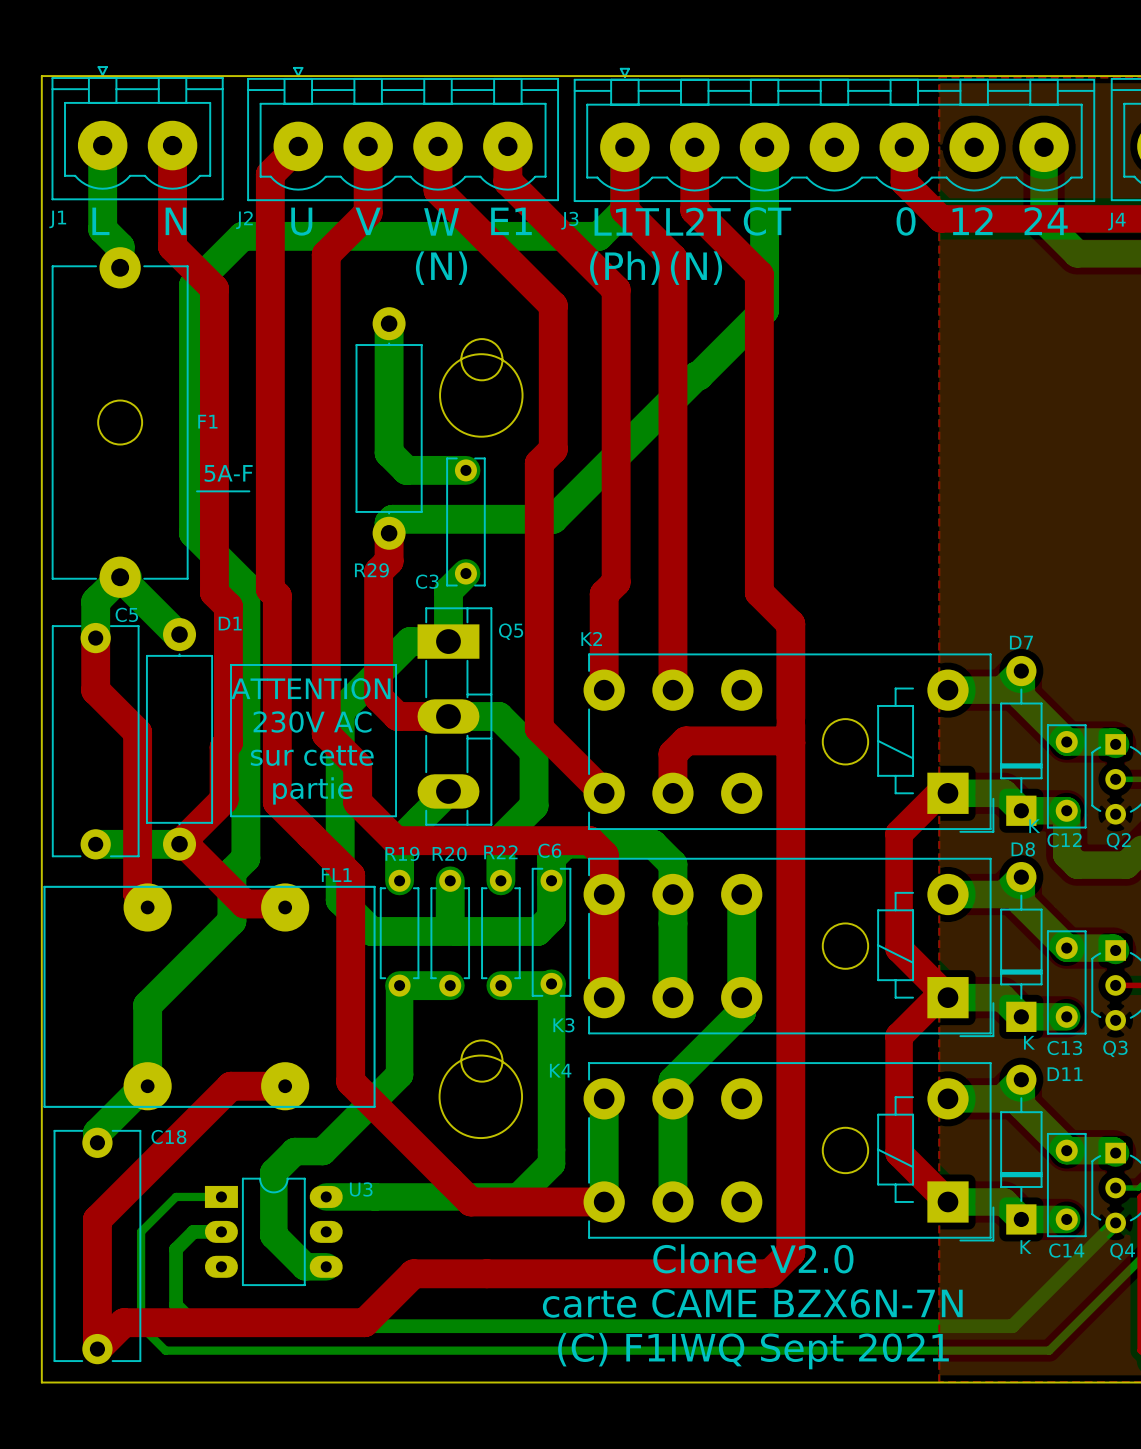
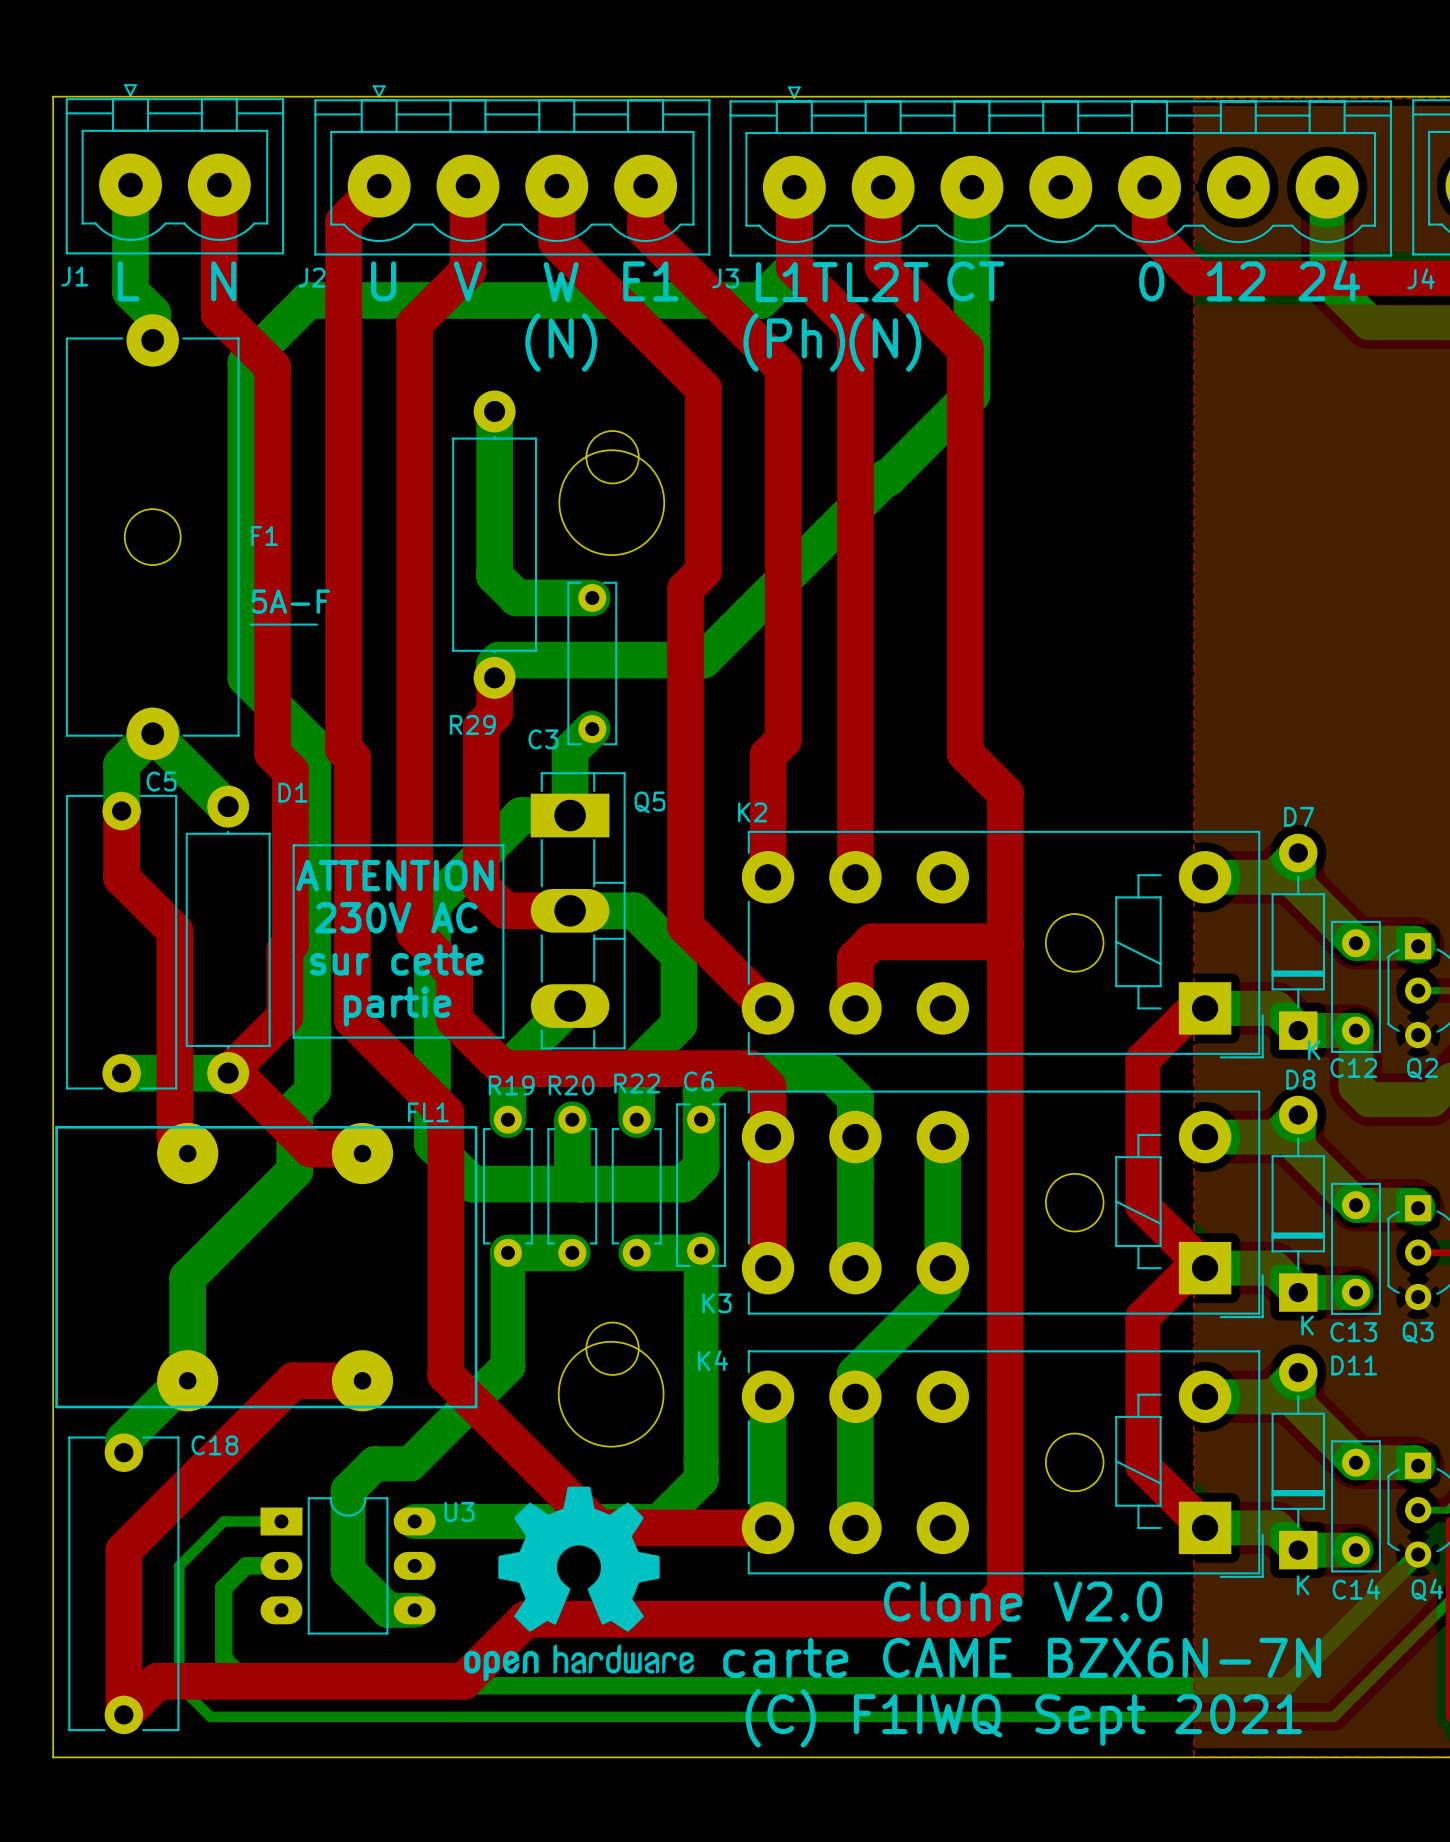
drawing: none -> [464, 1486, 694, 1682]
text position: Clone V2.0 (753, 1258) -> Clone V2.0 (1022, 1601)
text position: carte CAME BZX6N-7N (752, 1303) -> carte CAME BZX6N-7N (1022, 1657)
text position: (C) F1IWQ Sept 2021 (753, 1351) -> (C) F1IWQ Sept 2021 (1023, 1718)

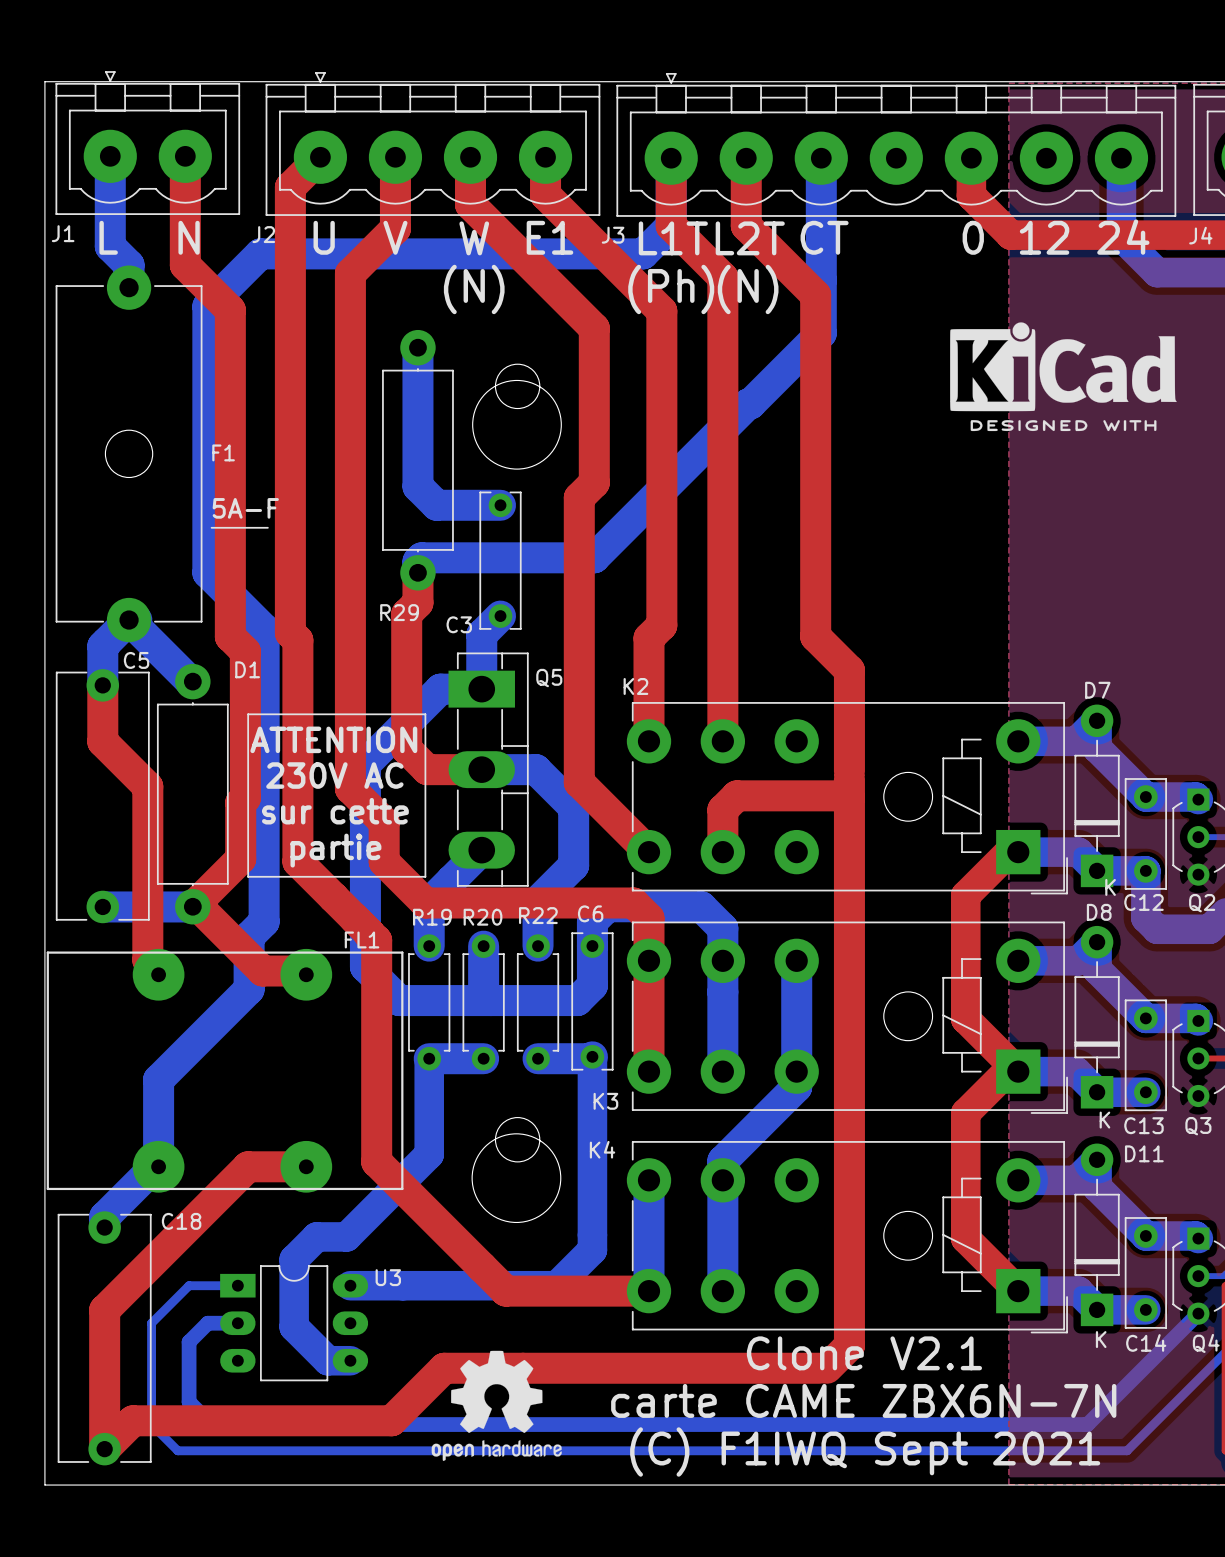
drawing: none -> [950, 322, 1177, 432]
drawing: [464, 1486, 694, 1682] -> none
drawing: none -> [431, 1350, 562, 1461]
text: Clone V2.0 (1022, 1601) -> Clone V2.1 (864, 1353)
text: carte CAME BZX6N-7N (1022, 1657) -> carte CAME ZBX6N-7N (863, 1400)

